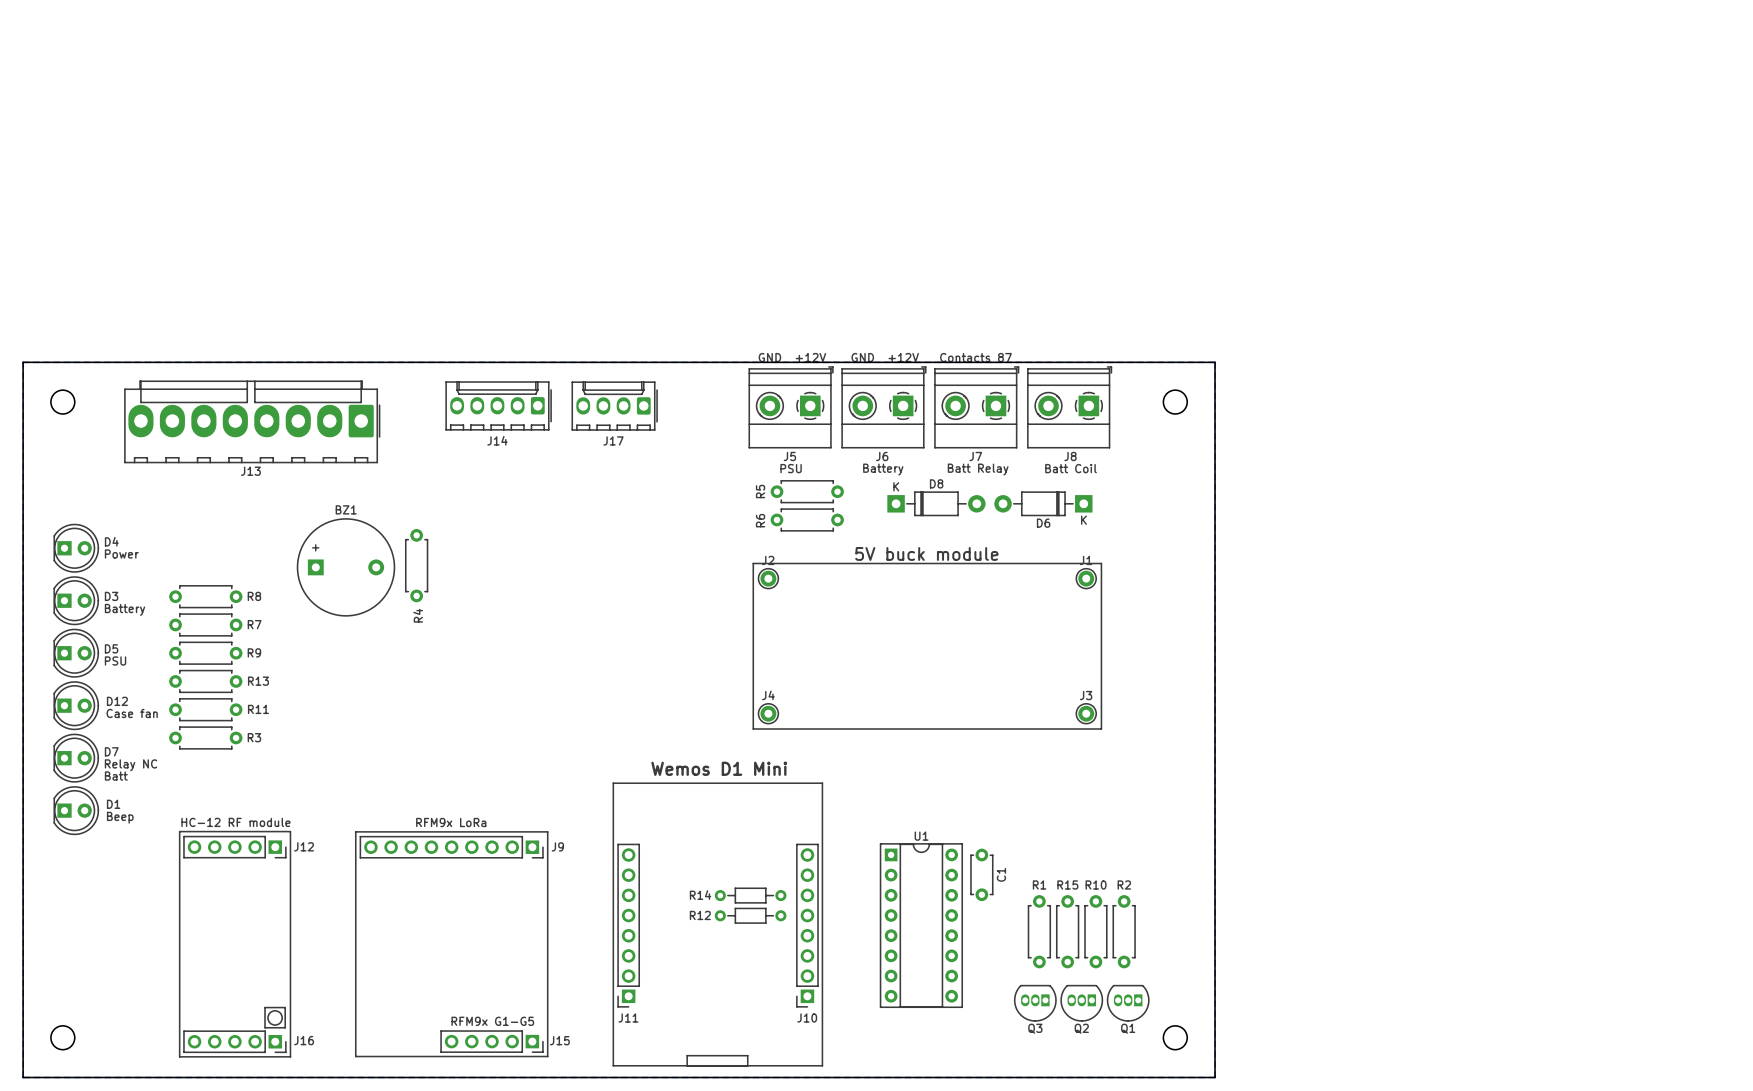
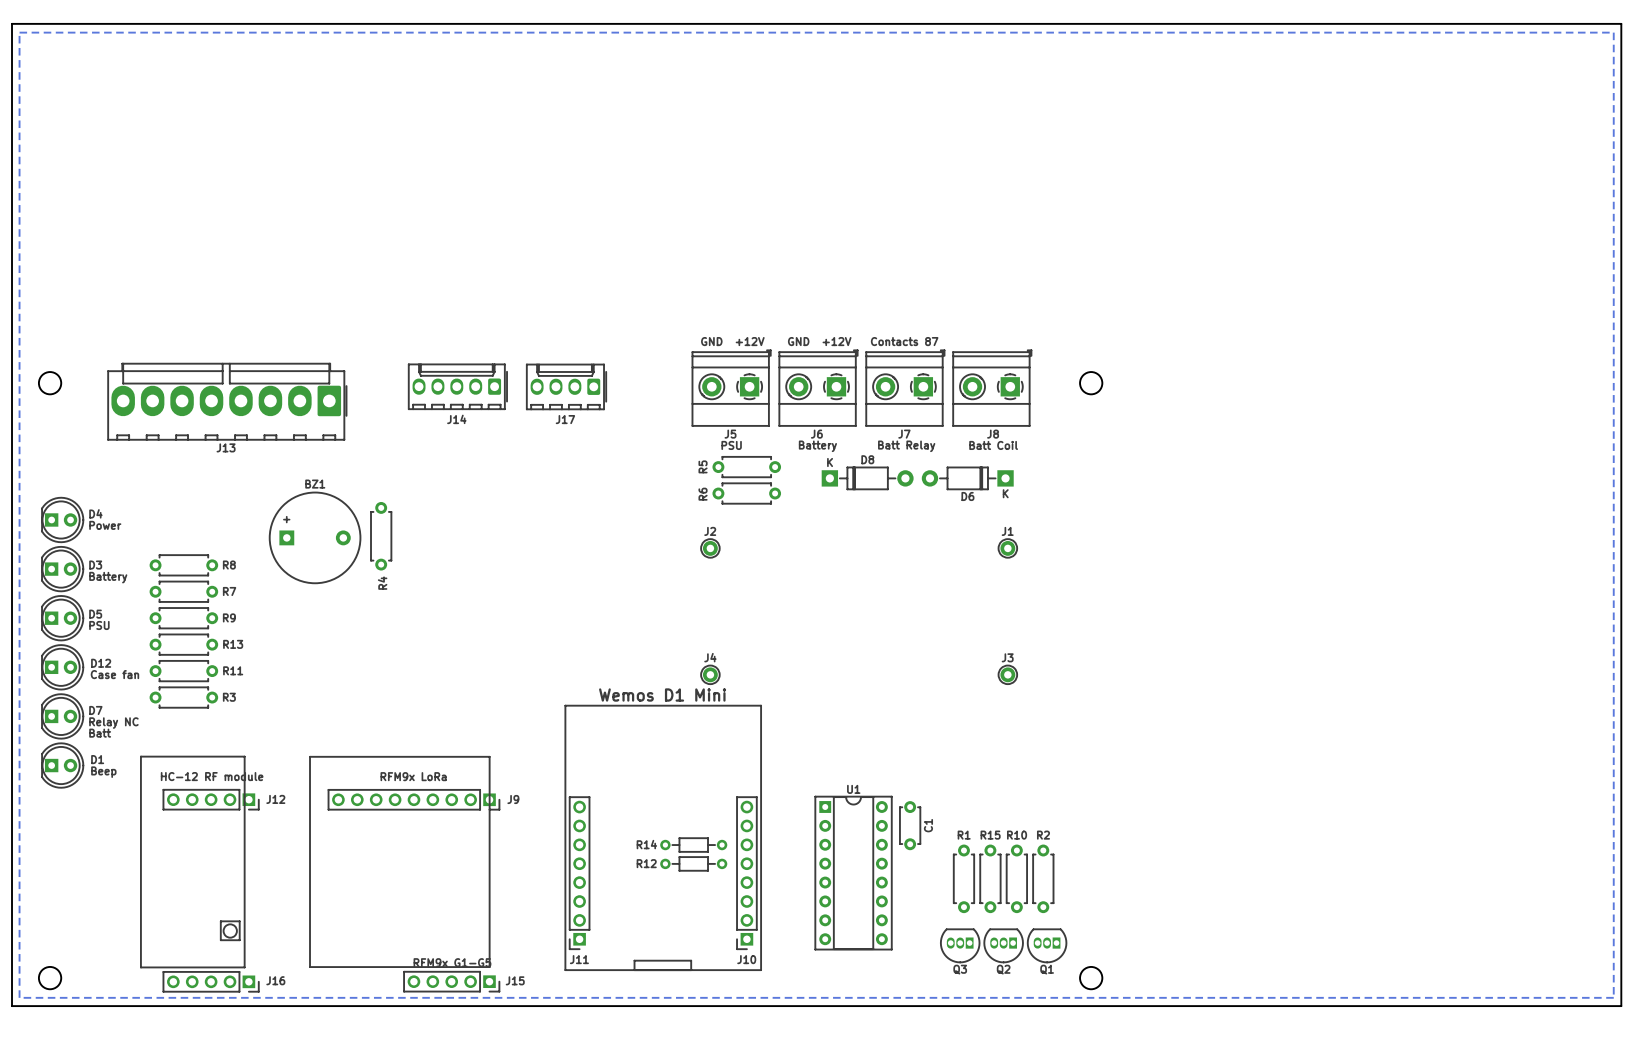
board edge: none -> (12, 23) (1621, 23) (1621, 1006) (12, 1006) (12, 23)
bottom zone outline: none -> (19, 32) (19, 997) (1613, 997) (1613, 32) (19, 32)
board edge: (23, 362) (1215, 362) (1215, 1077) (23, 1077) (23, 362) -> none
text: 5V buck module (926, 553) -> none
line: (753, 563) (1101, 563) (1101, 729) (753, 729) (753, 563) -> none
text position: Wemos D1 Mini (719, 768) -> Wemos D1 Mini (662, 695)
line: (613, 783) (822, 783) (822, 1065) (613, 1065) (613, 783) -> (565, 705) (761, 705) (761, 970) (565, 970) (565, 705)
line: (179, 831) (290, 831) (290, 1056) (179, 1056) (179, 831) -> (140, 756) (244, 756) (244, 967) (140, 967) (140, 756)
line: (355, 831) (547, 831) (547, 1056) (355, 1056) (355, 831) -> (310, 756) (489, 756) (489, 967) (310, 967) (310, 756)
line: (265, 1007) (265, 1027) (285, 1027) (285, 1007) (265, 1007) -> (220, 921) (220, 940) (239, 940) (239, 921) (220, 921)
drawing position: (275, 1017) -> (230, 931)
line: (687, 1065) (687, 1055) (747, 1055) (747, 1065) -> (634, 970) (634, 960) (691, 960) (691, 970)

